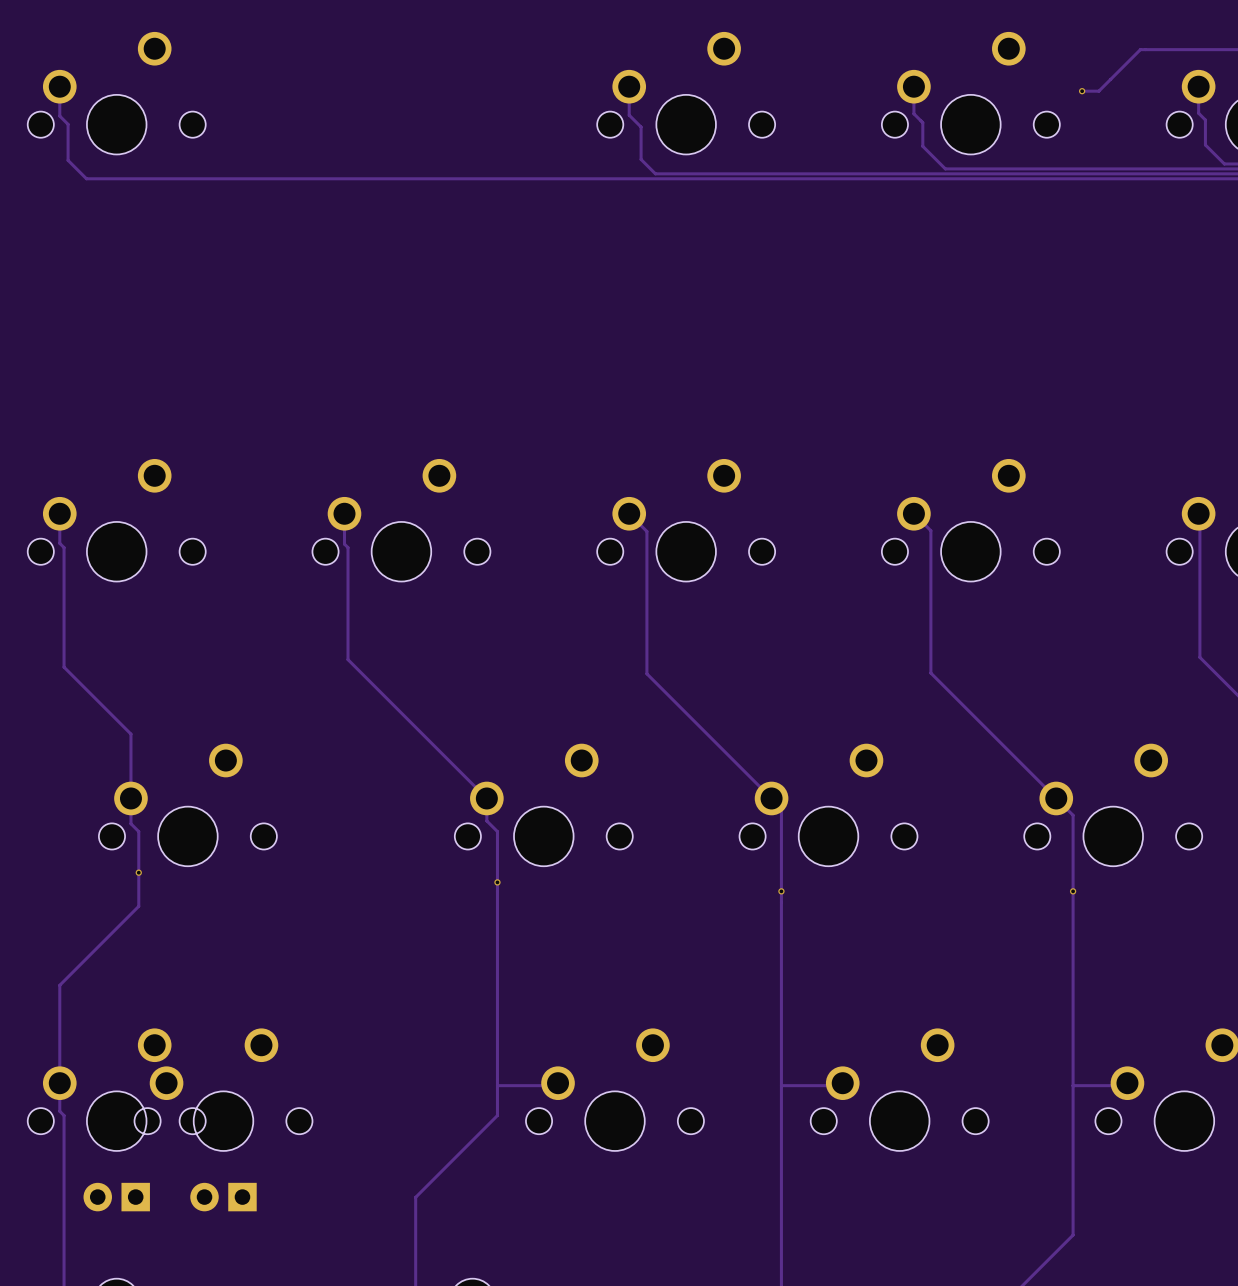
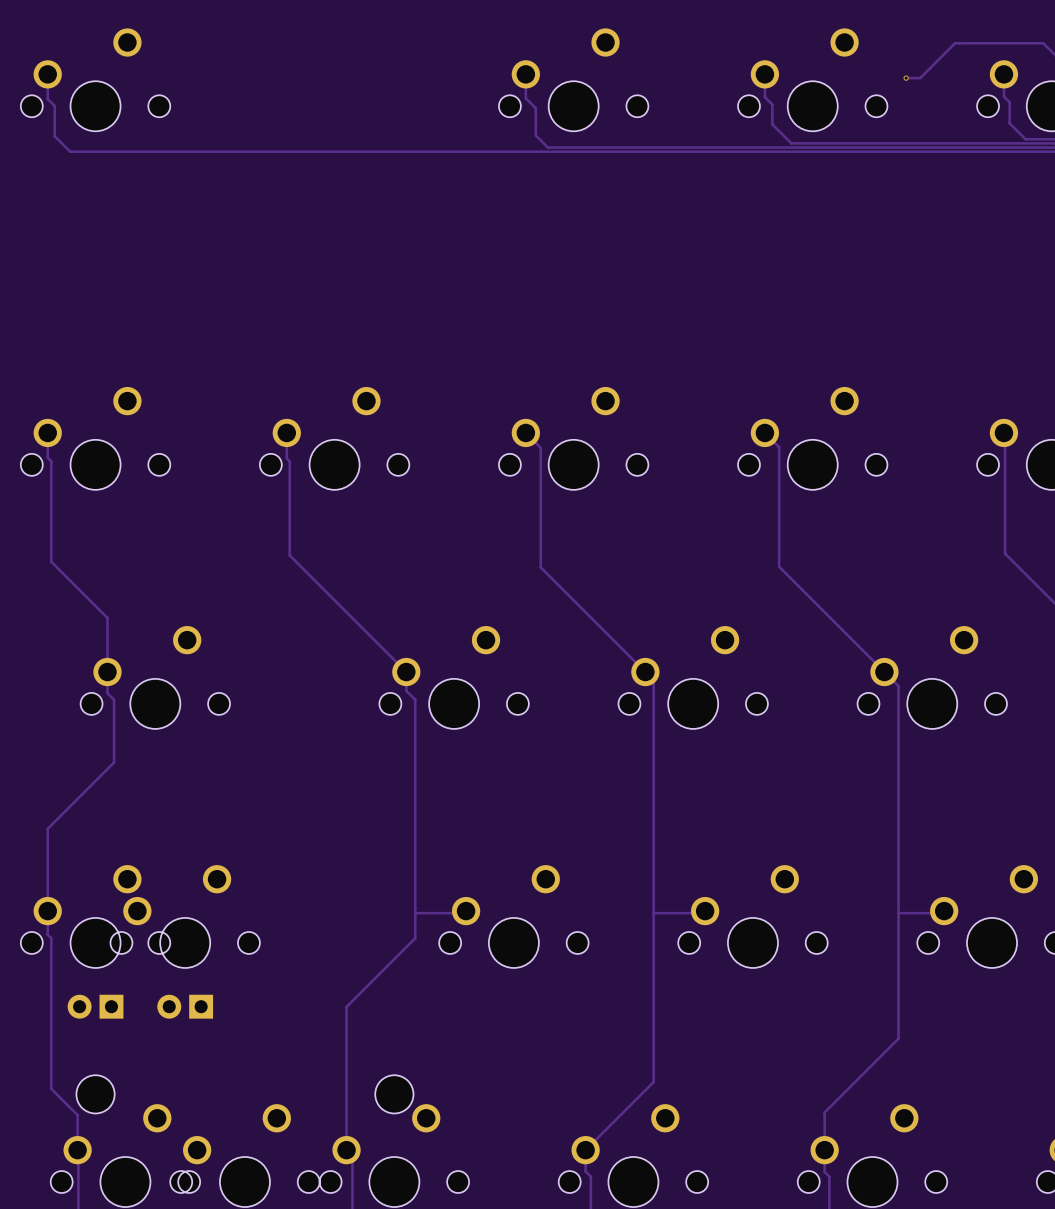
via: (138, 872) -> none
via: (497, 882) -> none
via: (781, 891) -> none
via: (1073, 891) -> none

